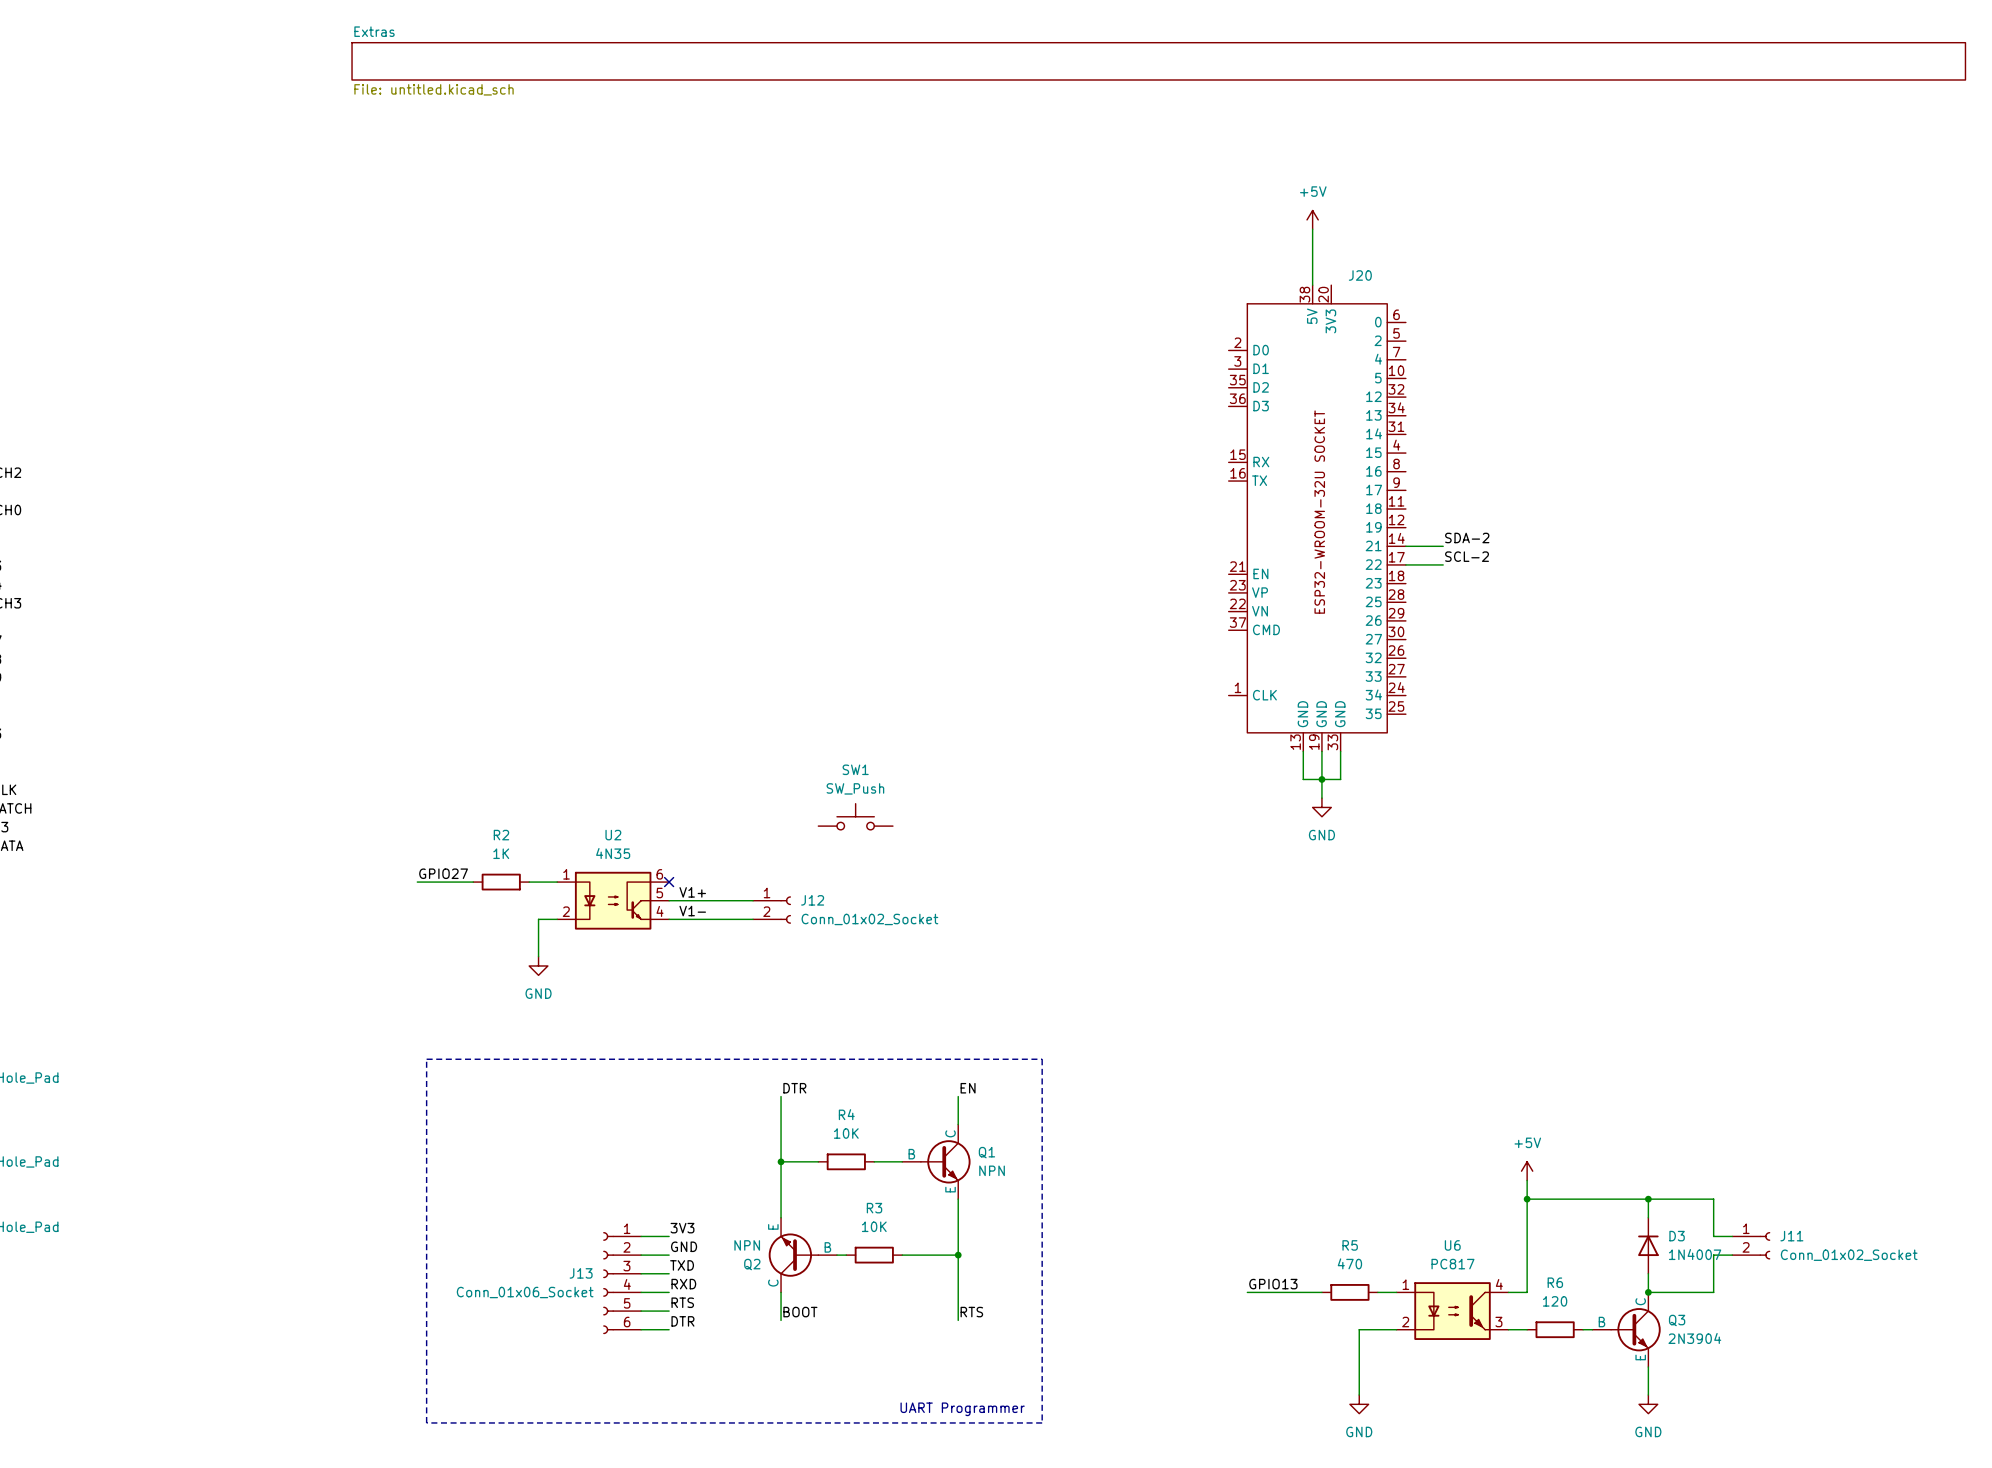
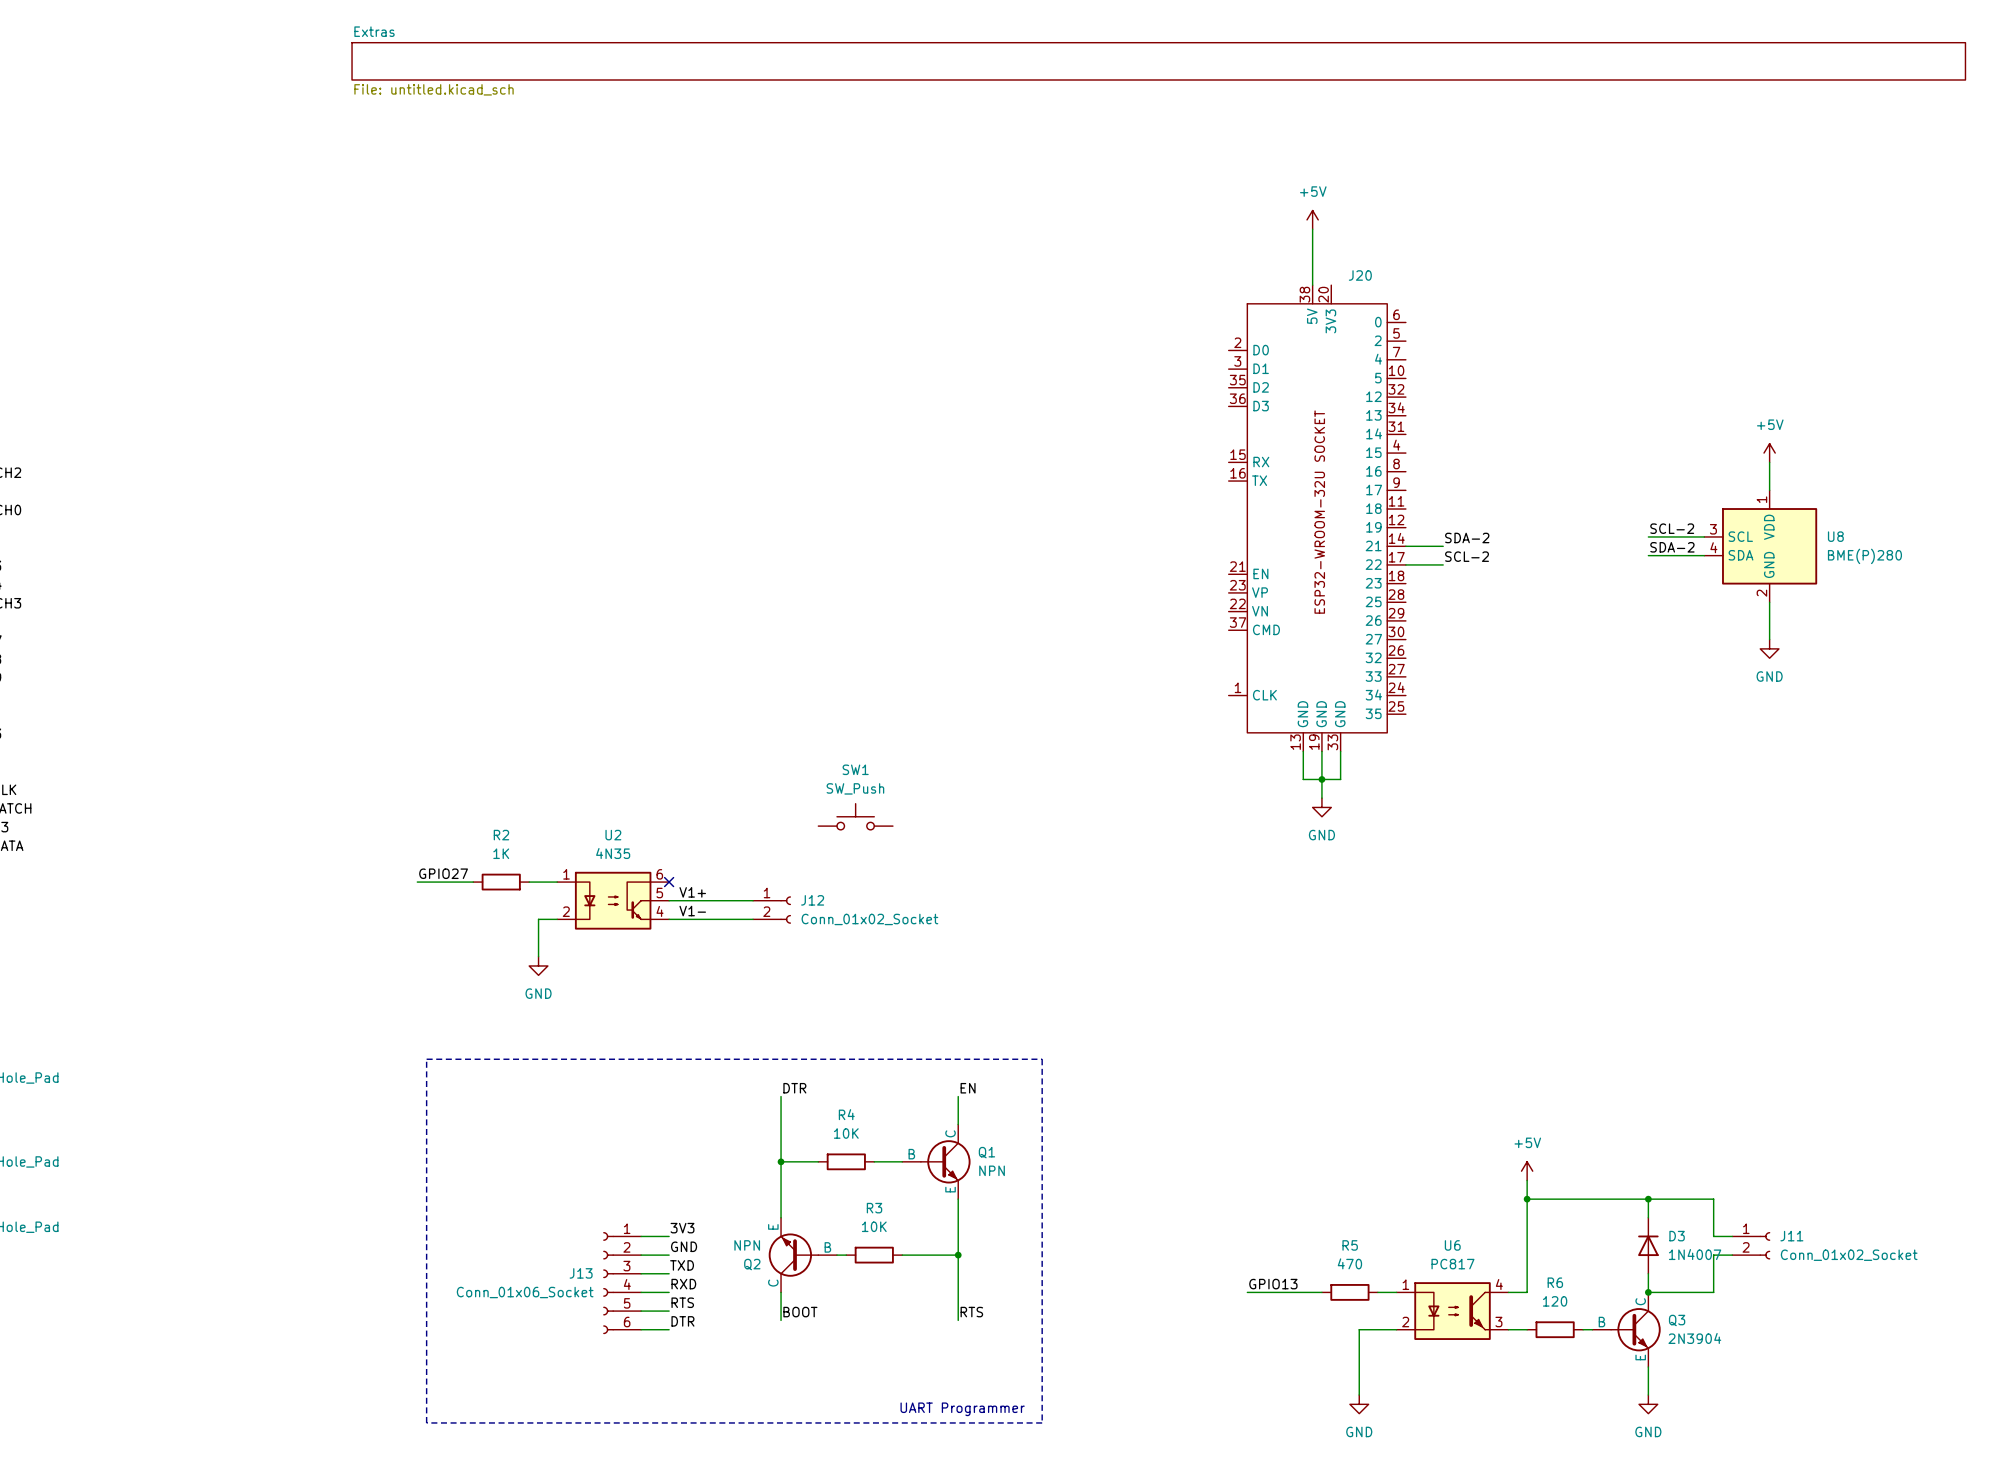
power symbol: none -> +5V (1769, 453)
wire: none -> (1769, 462) (1769, 490)
label: none -> SCL-2 (1672, 528)
wire: none -> (1648, 536) (1704, 536)
U8: none -> BME(P)280 (1760, 546)
label: none -> SDA-2 (1672, 547)
wire: none -> (1648, 555) (1704, 555)
wire: none -> (1769, 602) (1769, 639)
power symbol: none -> GND (1769, 648)

